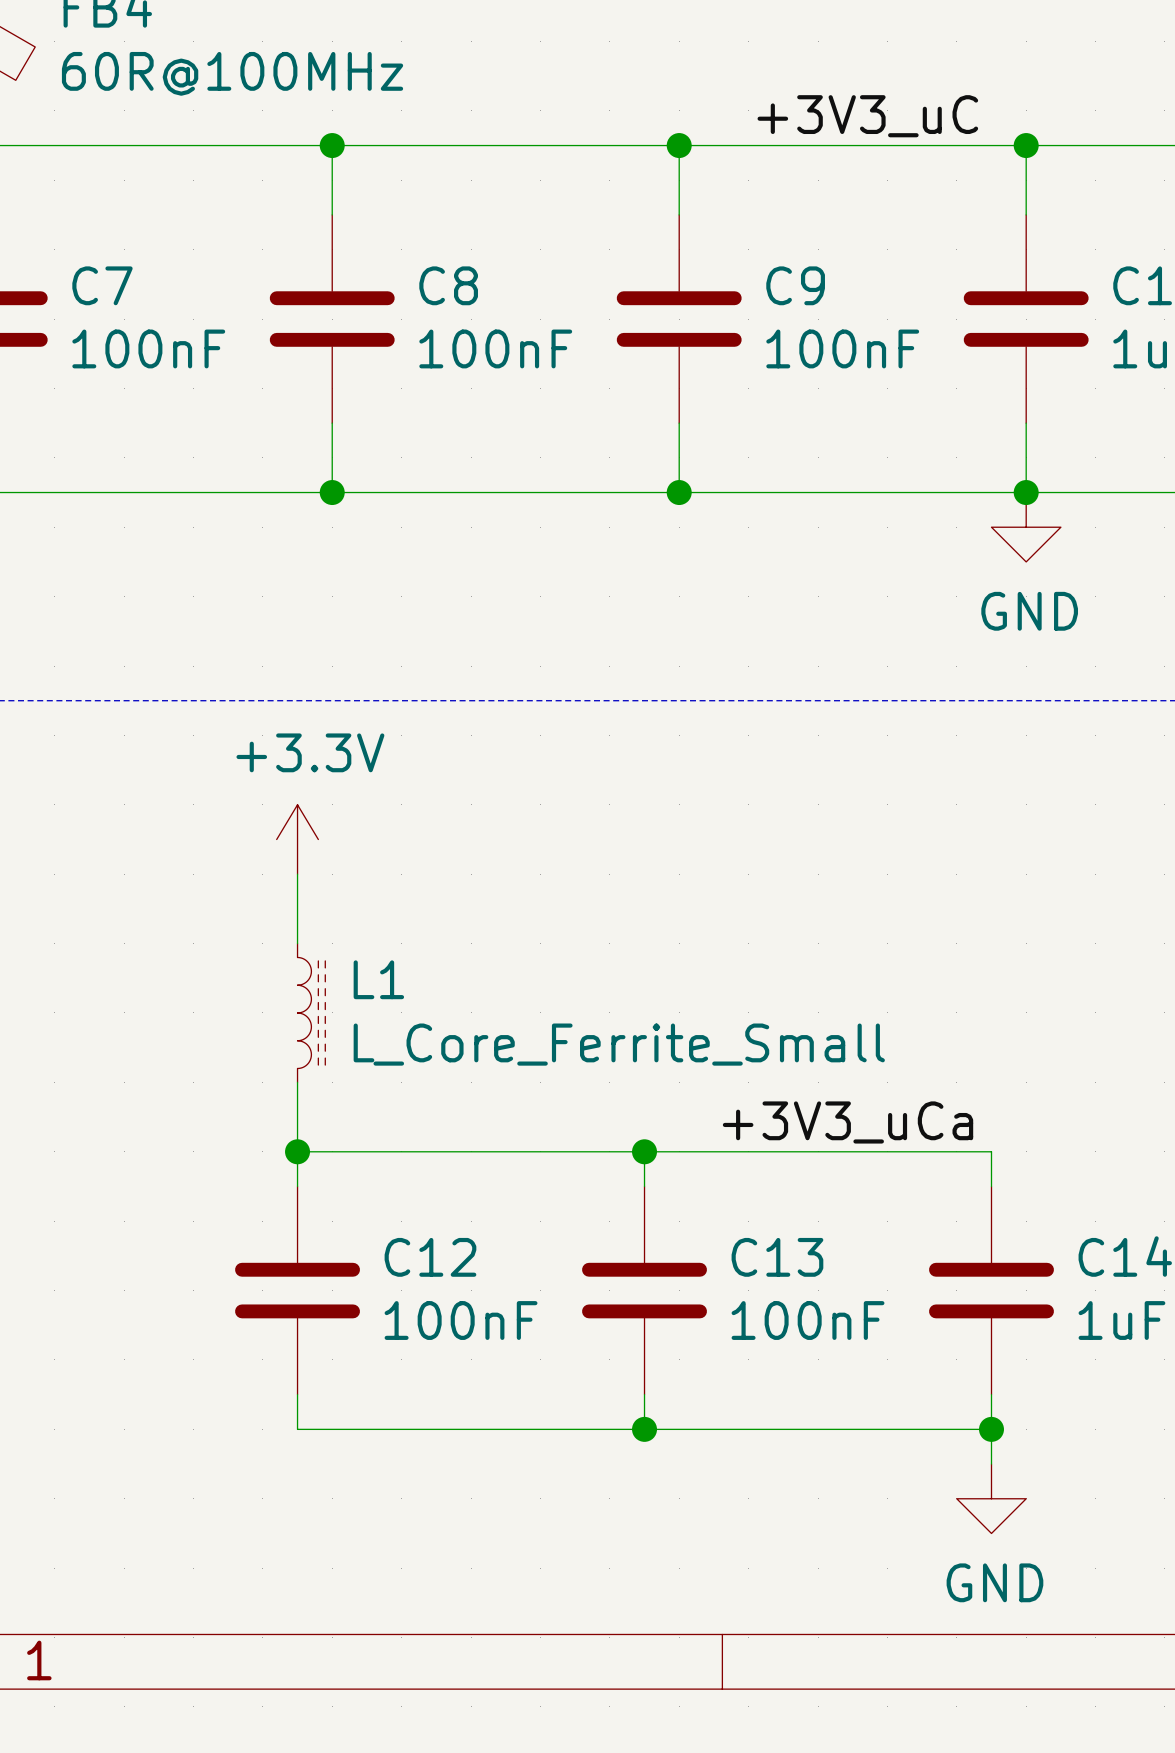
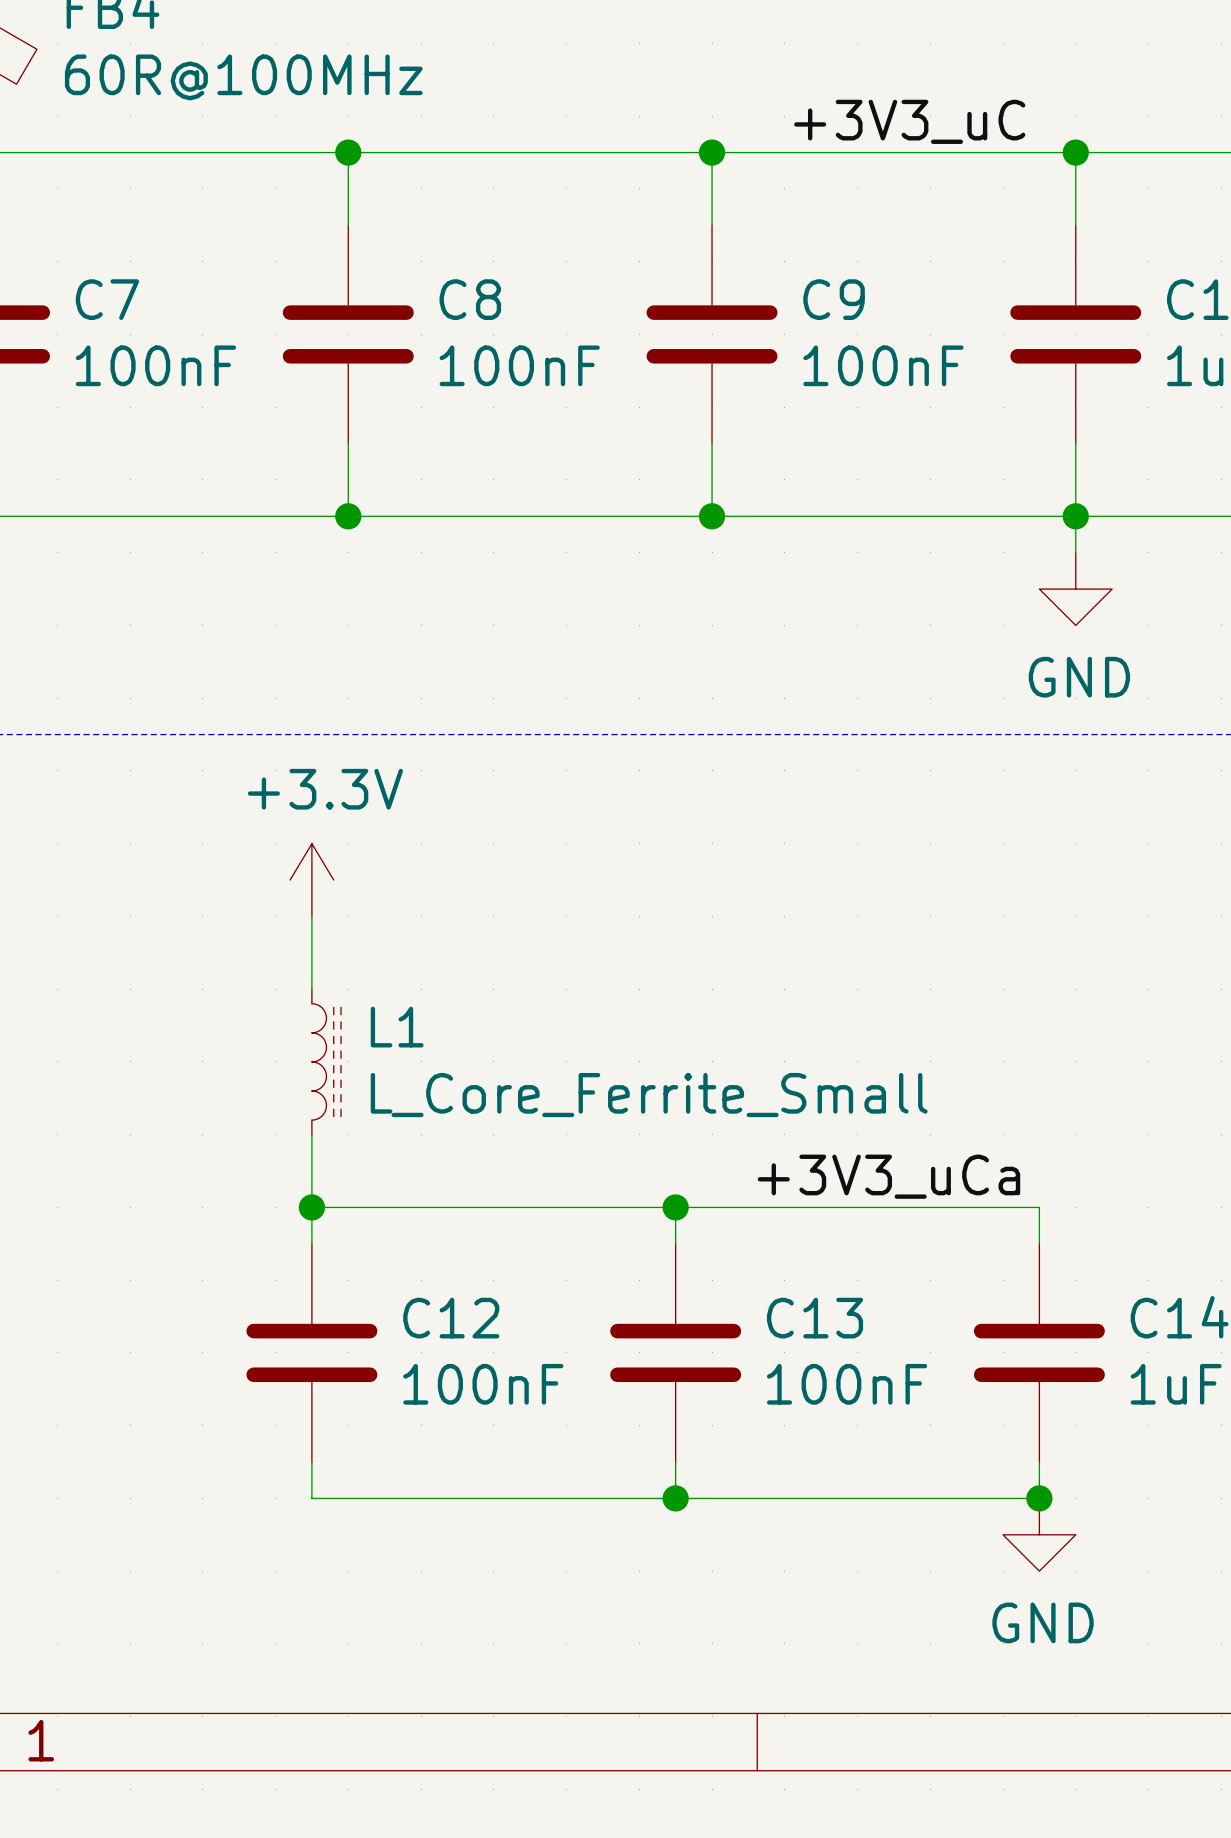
power symbol position: GND (1026, 527) -> GND (1075, 589)
power symbol position: GND (991, 1498) -> GND (1039, 1534)

